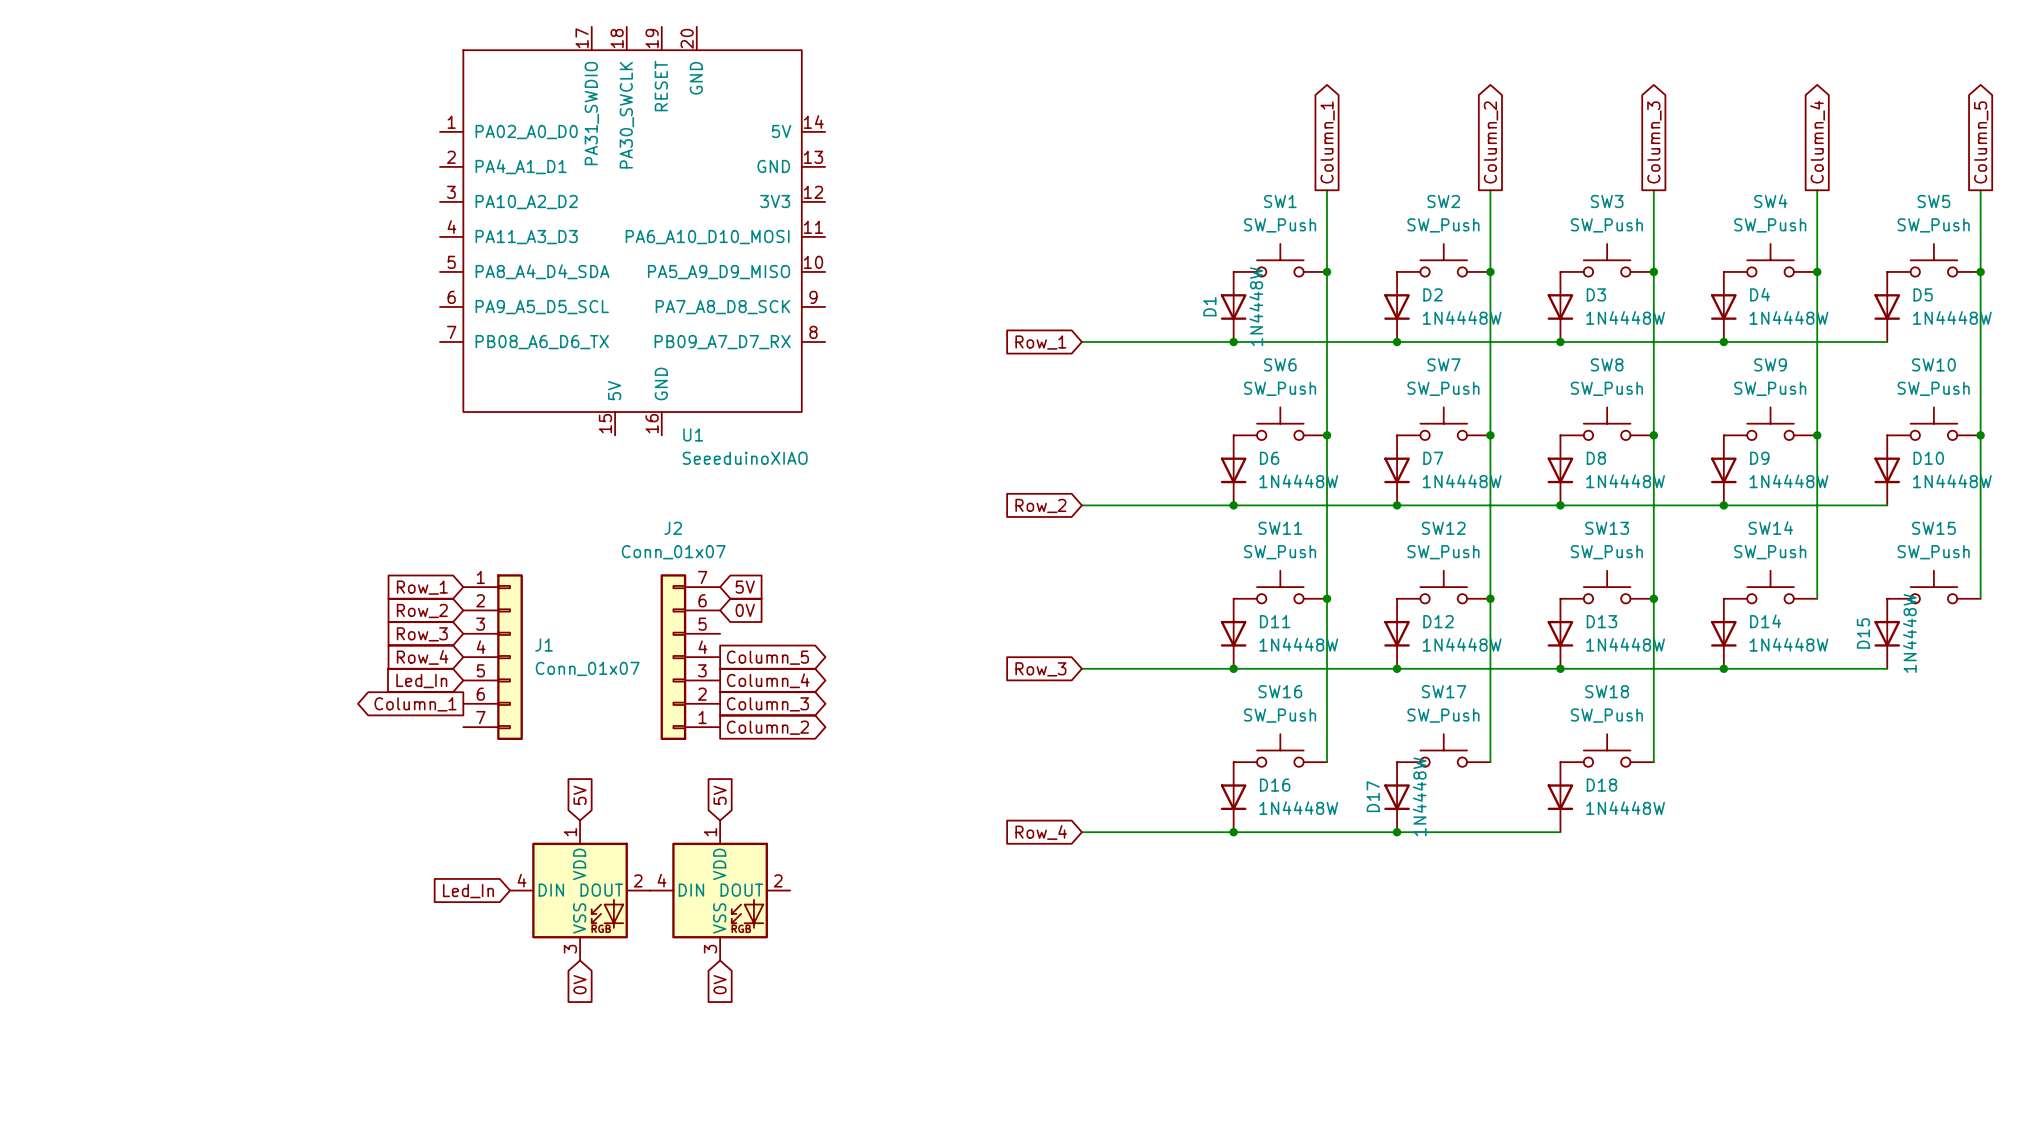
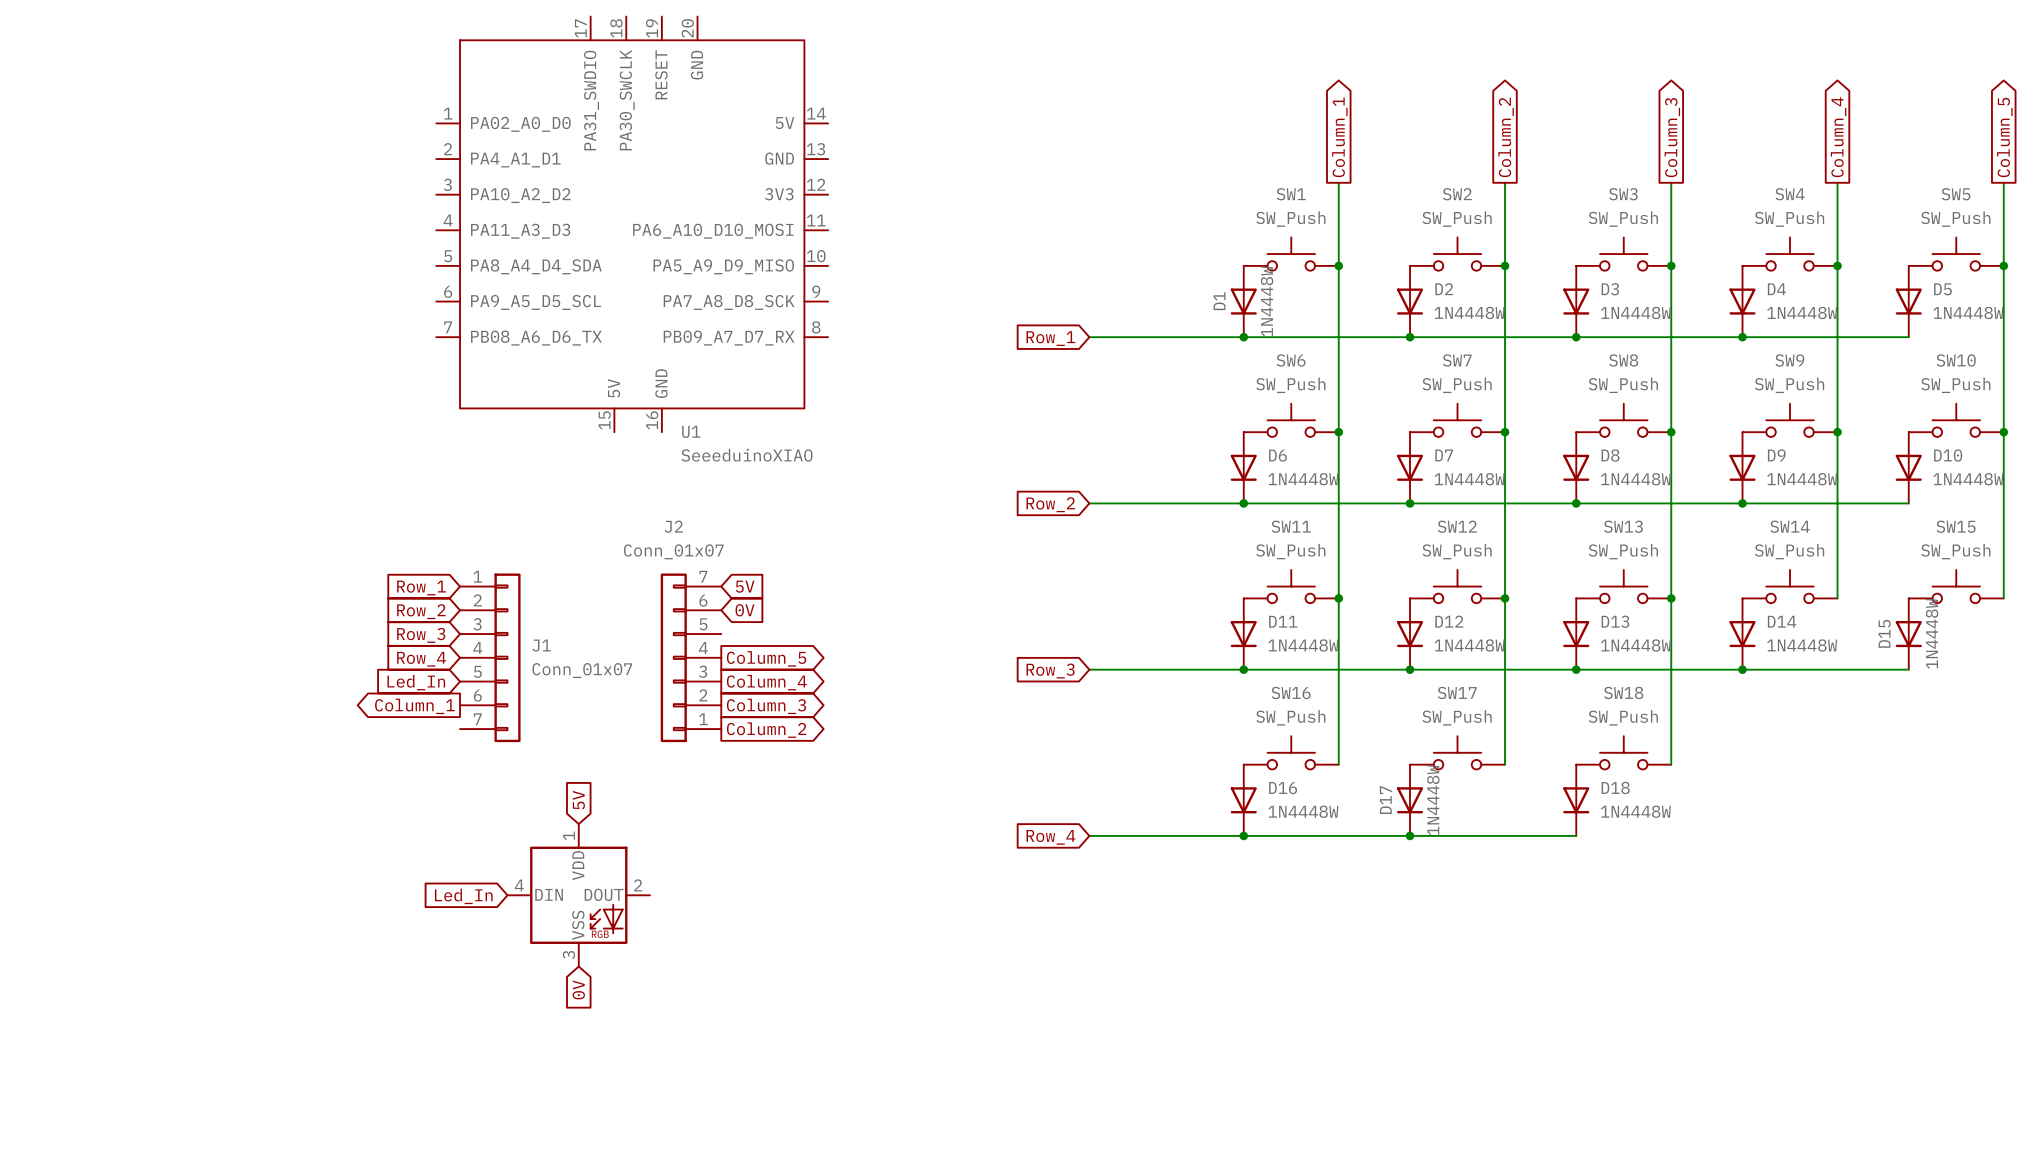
global label: 5V (720, 795) -> none
part: (720, 890) -> none
global label: 0V (720, 984) -> none

